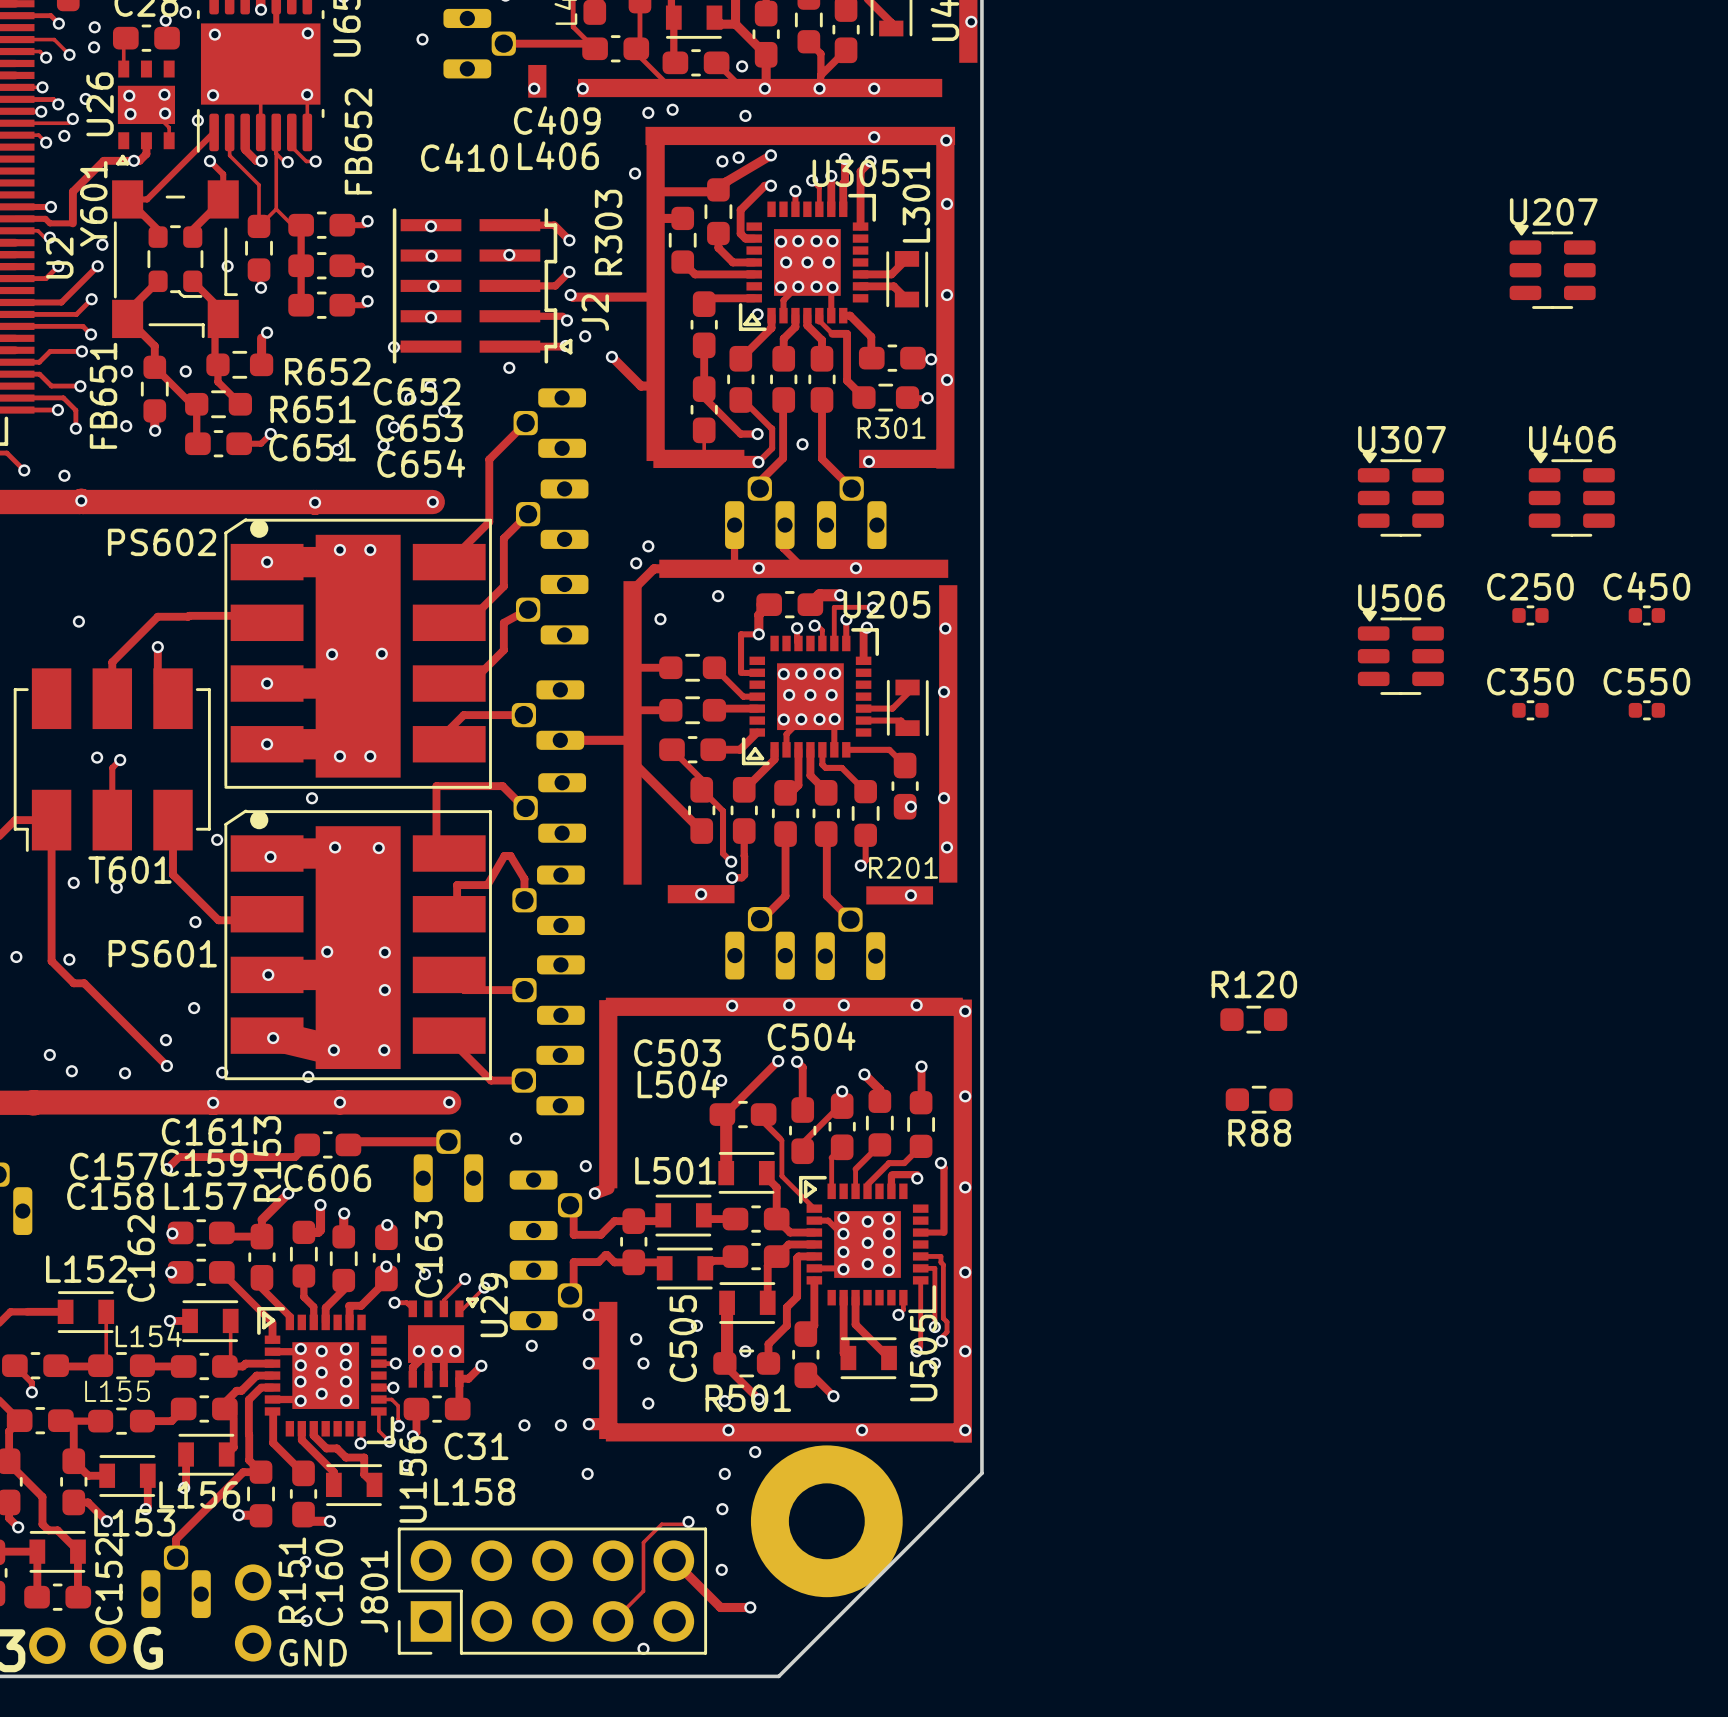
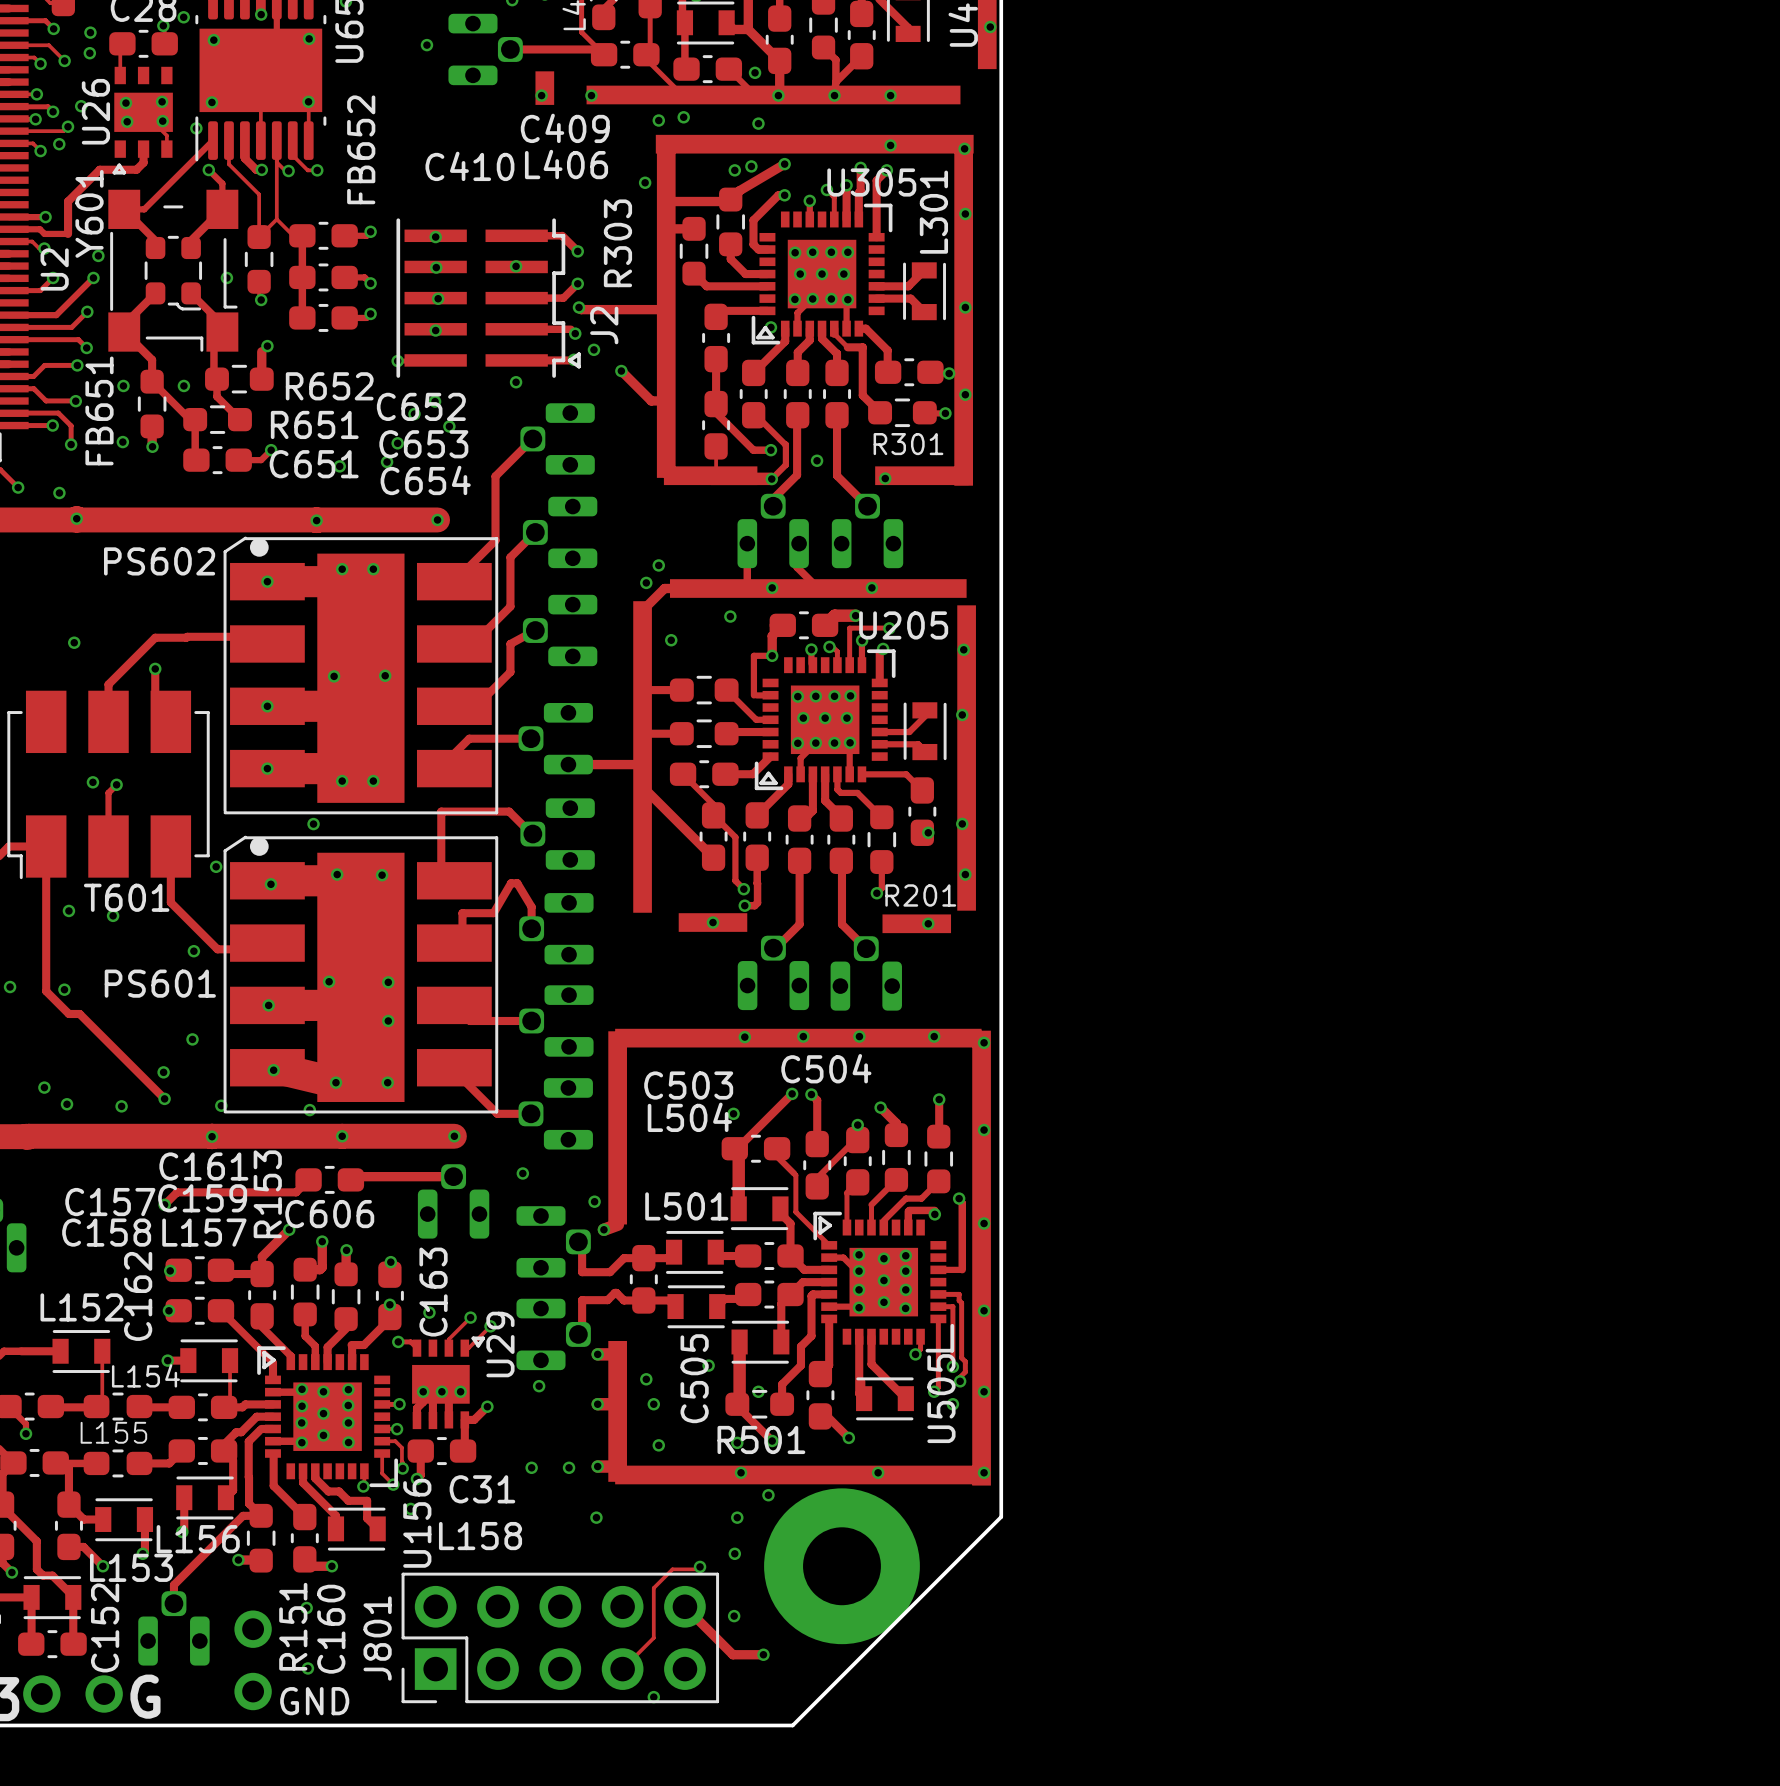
via: (133, 160) -> none
U207: (1552, 266) -> none
U307: (1400, 494) -> none
U406: (1571, 494) -> none
C250: (1530, 615) -> none
C450: (1646, 615) -> none
U506: (1400, 652) -> none
C350: (1530, 710) -> none
C550: (1646, 710) -> none
R120: (1253, 1019) -> none
R88: (1259, 1099) -> none

